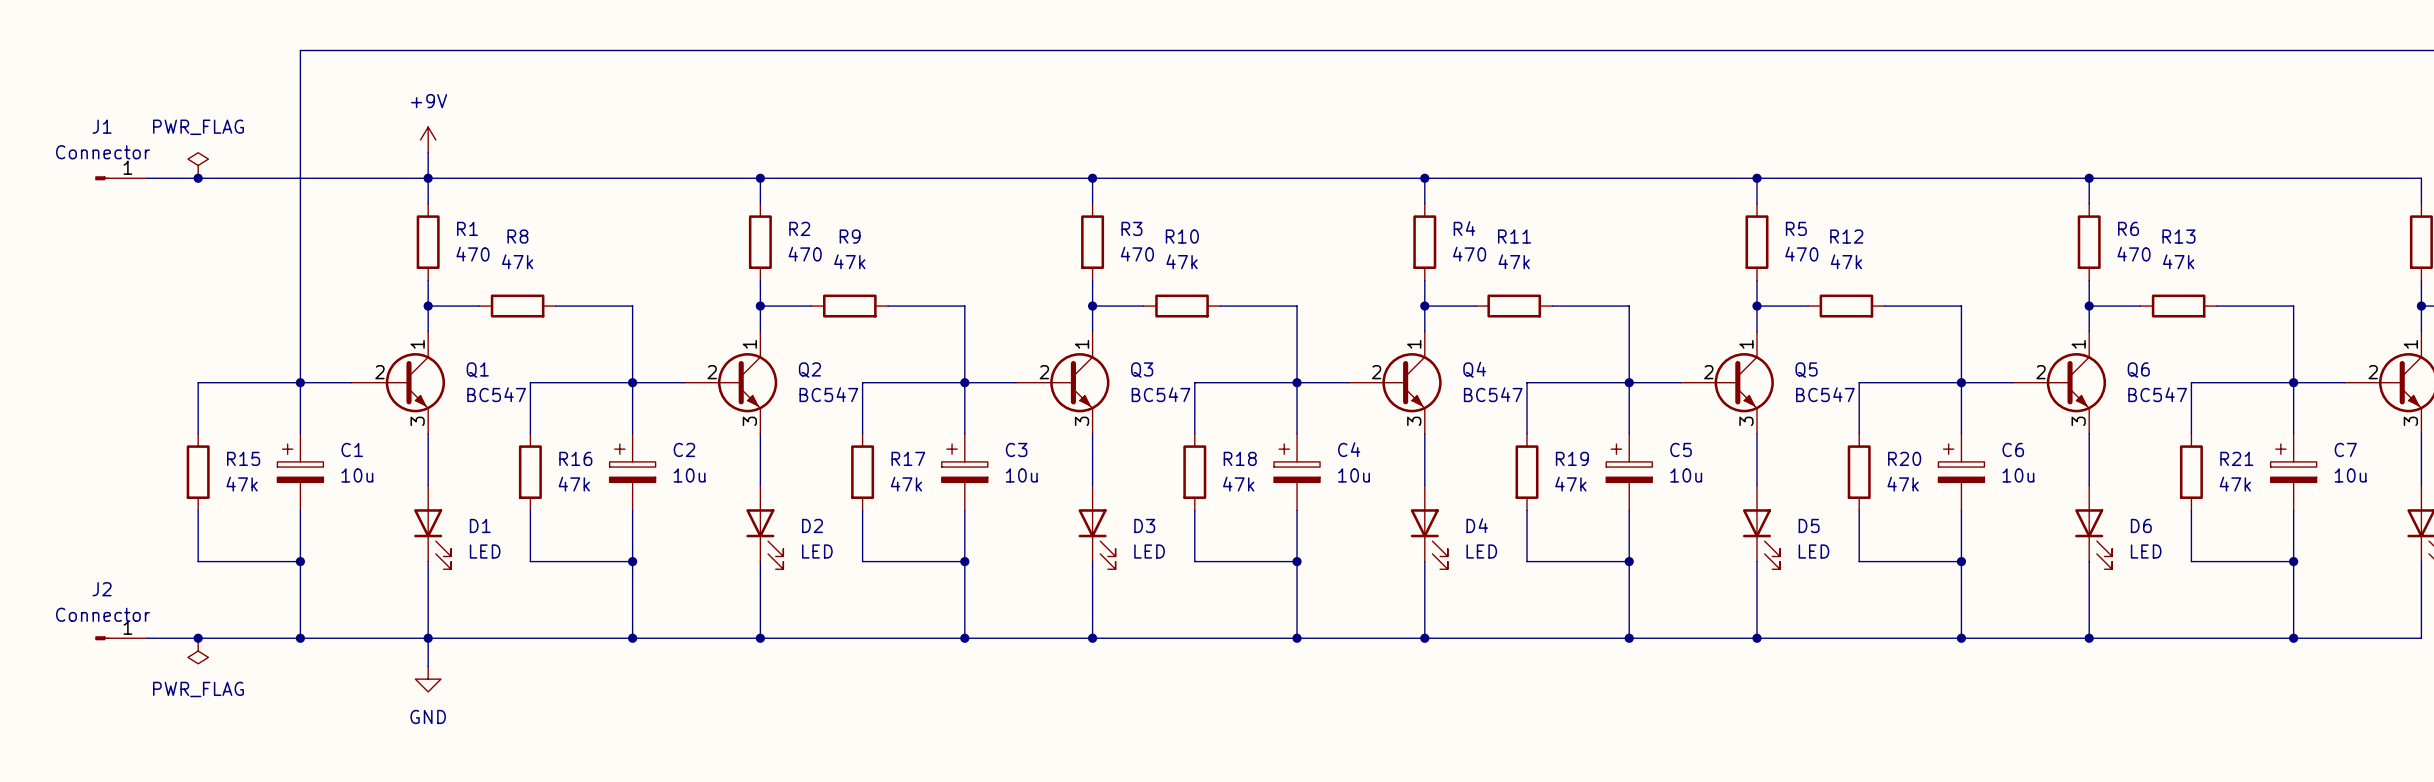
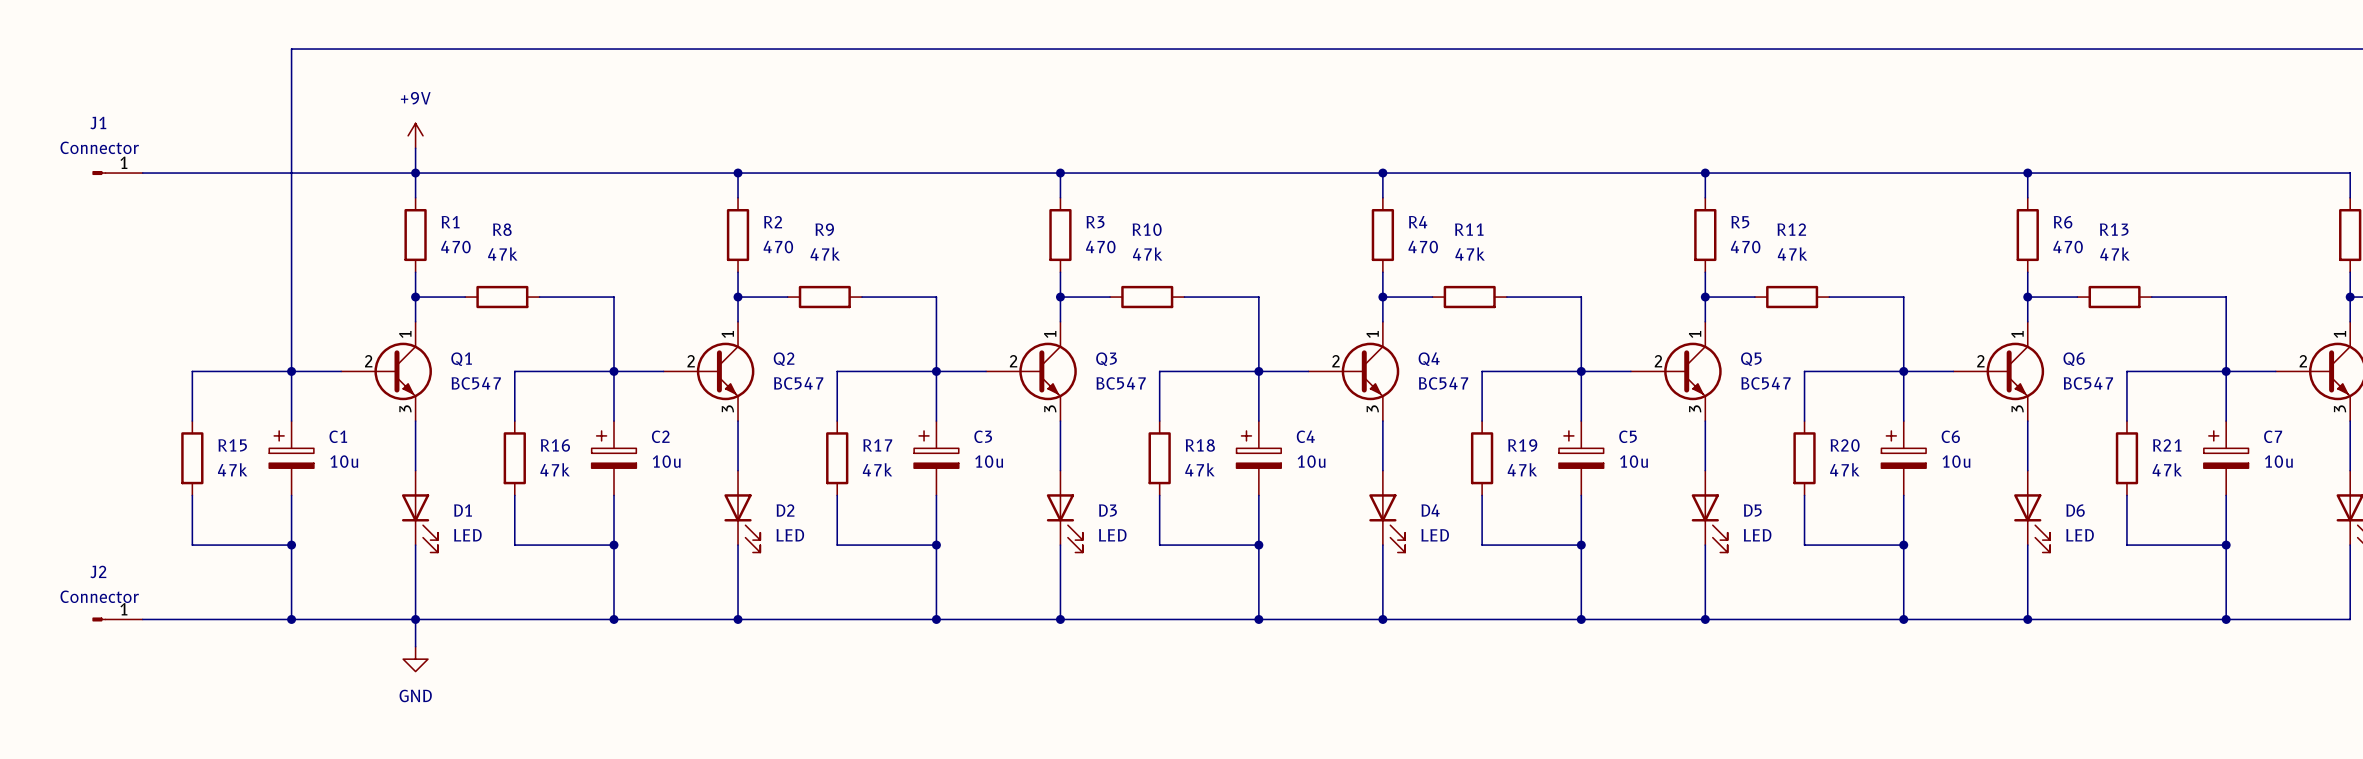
power symbol: PWR_FLAG (198, 165) -> none
junction: (198, 178) -> none
junction: (198, 638) -> none
power symbol: PWR_FLAG (198, 651) -> none

